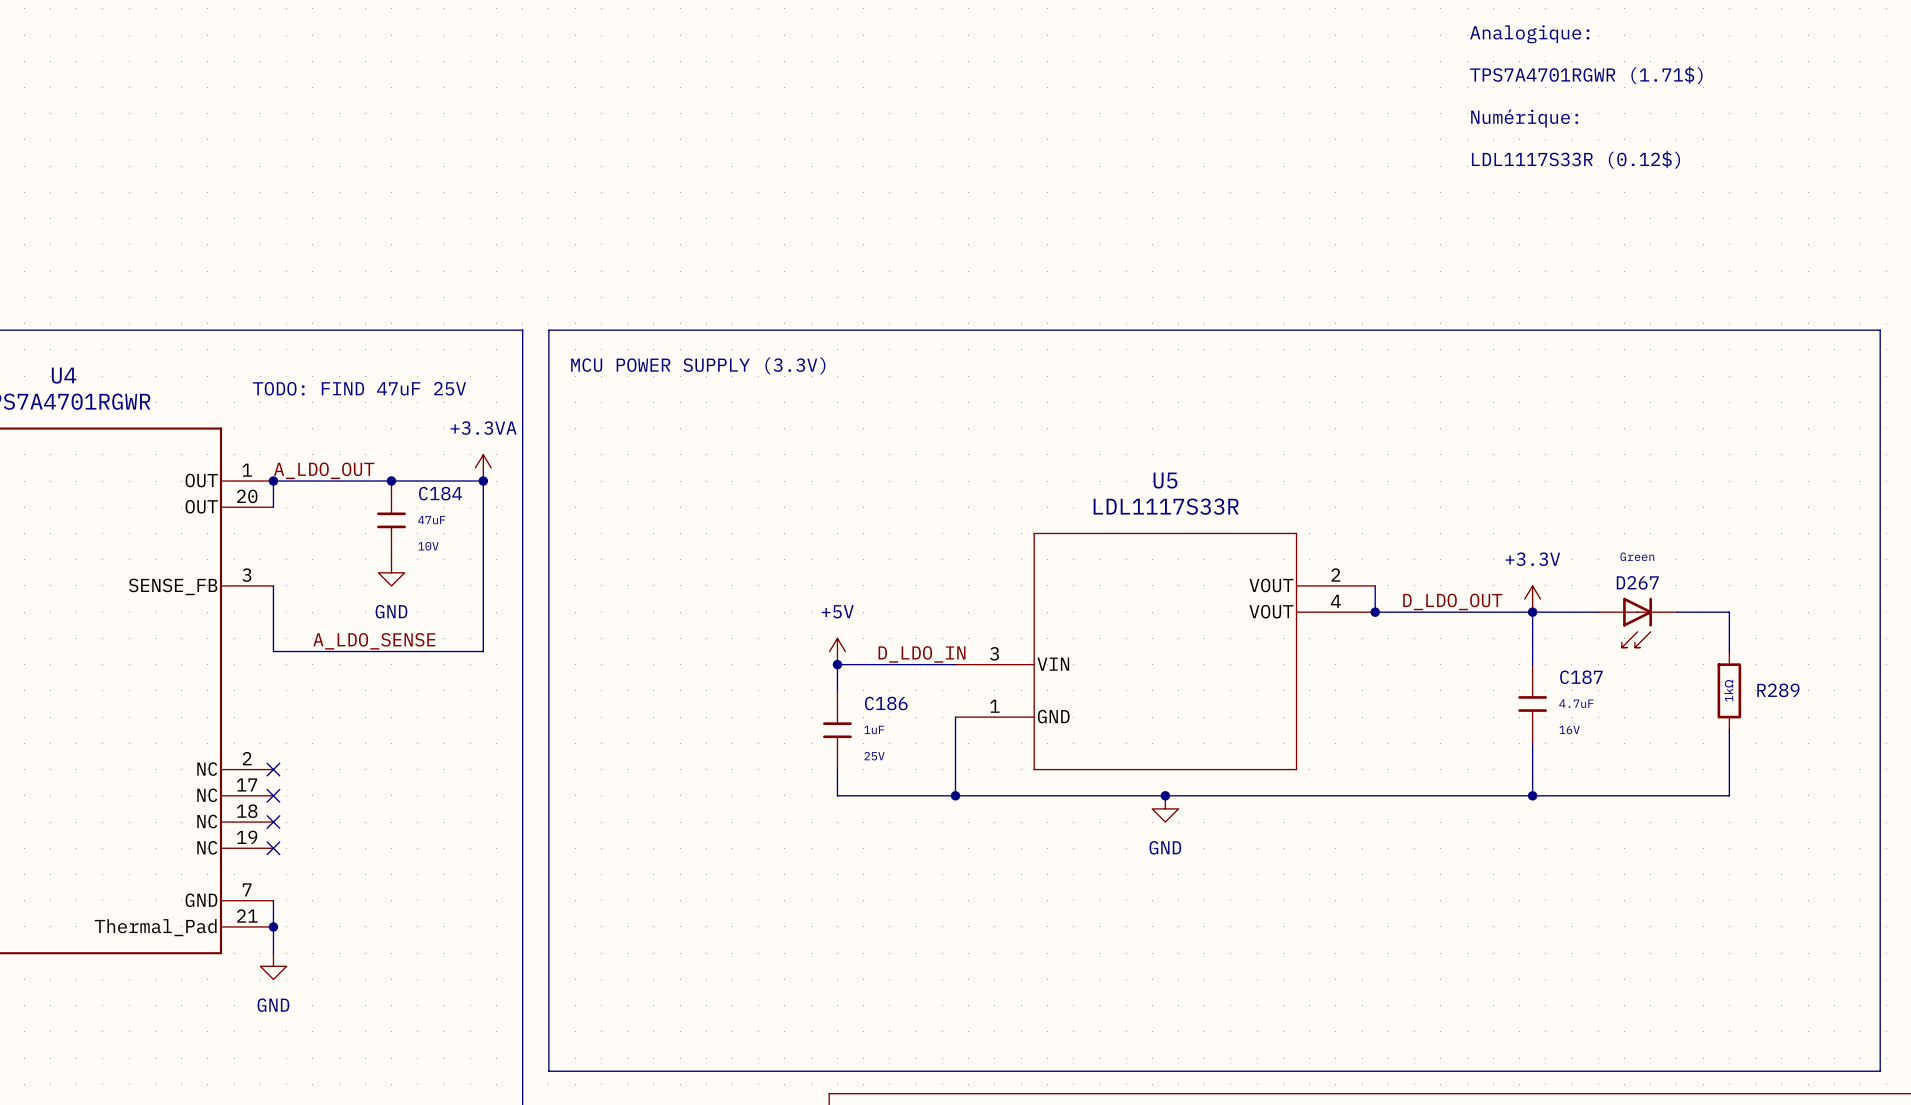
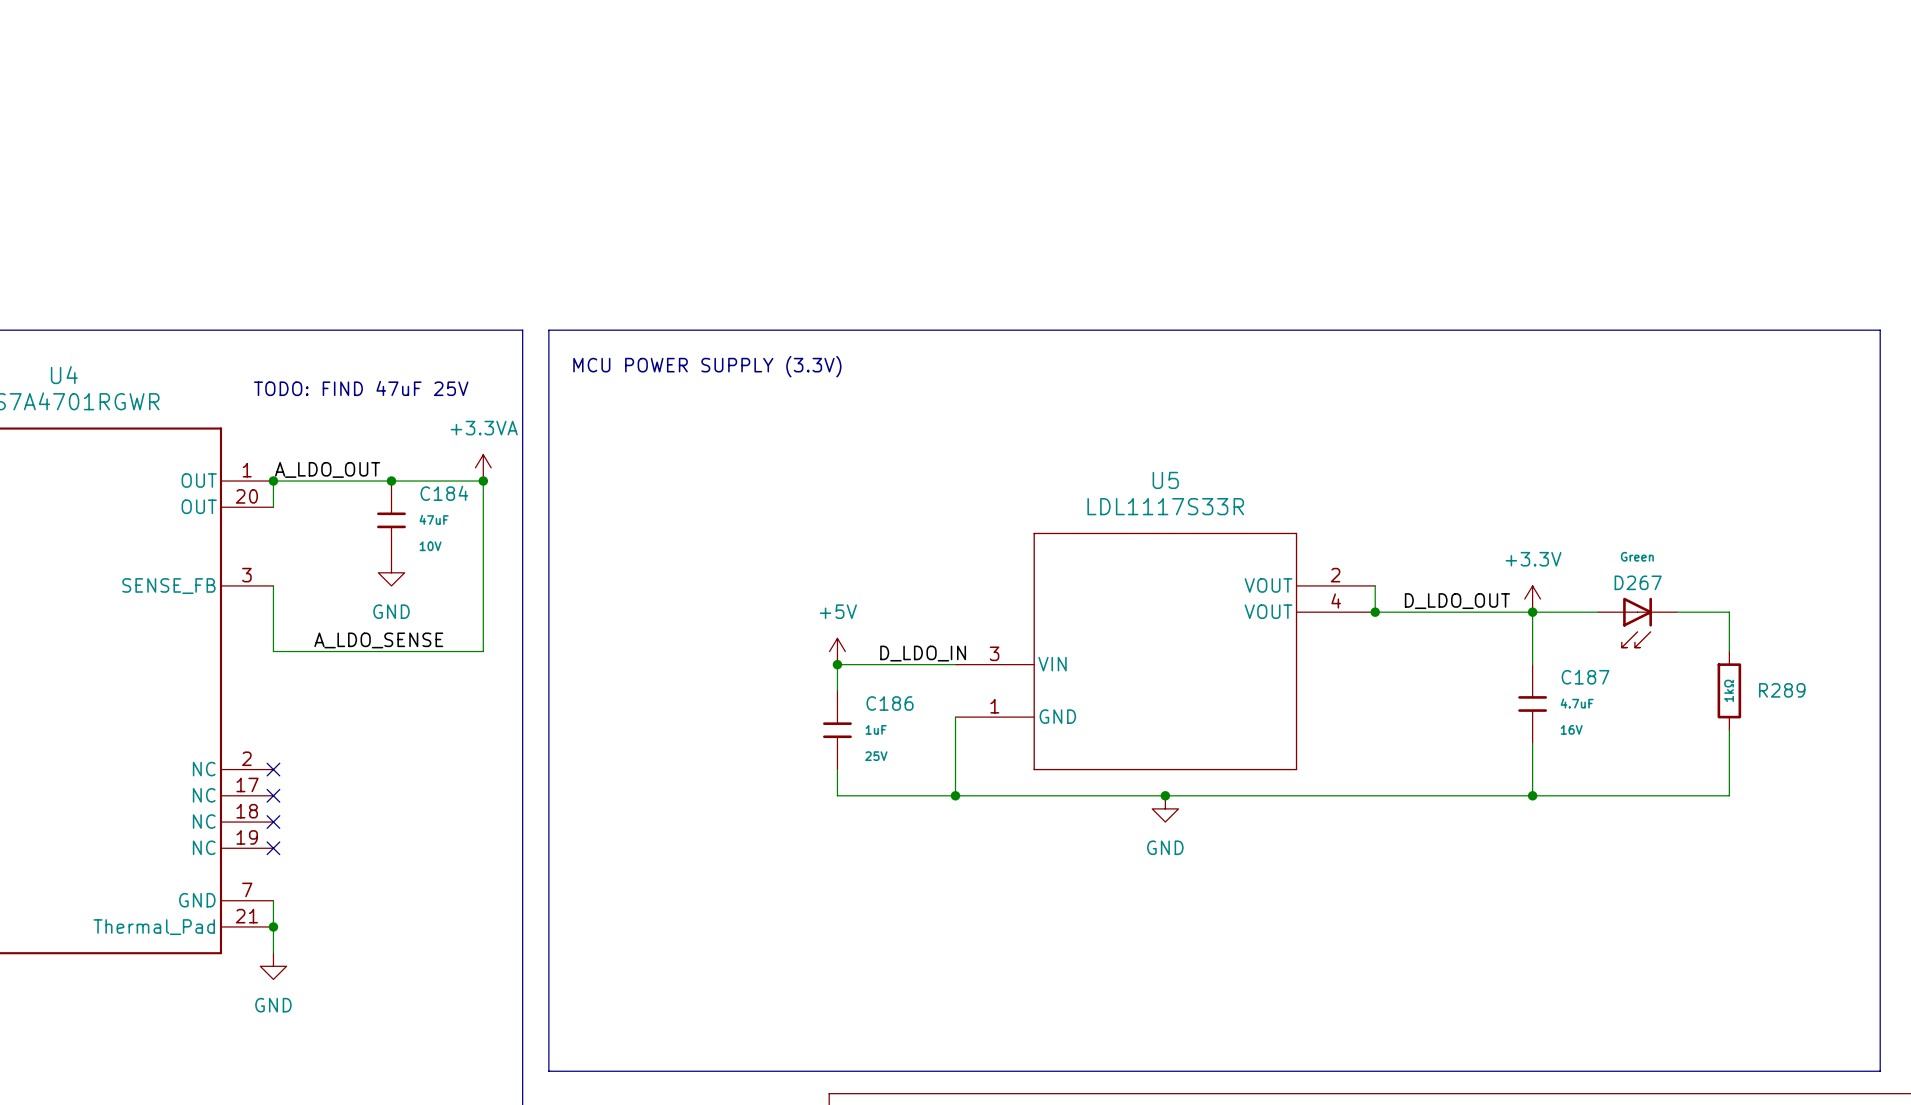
text: Analogique: (1529, 34) -> none
text: TPS7A4701RGWR (1.71$) (1586, 75) -> none
text: Numérique: (1524, 118) -> none
text: LDL1117S33R (0.12$) (1575, 159) -> none

